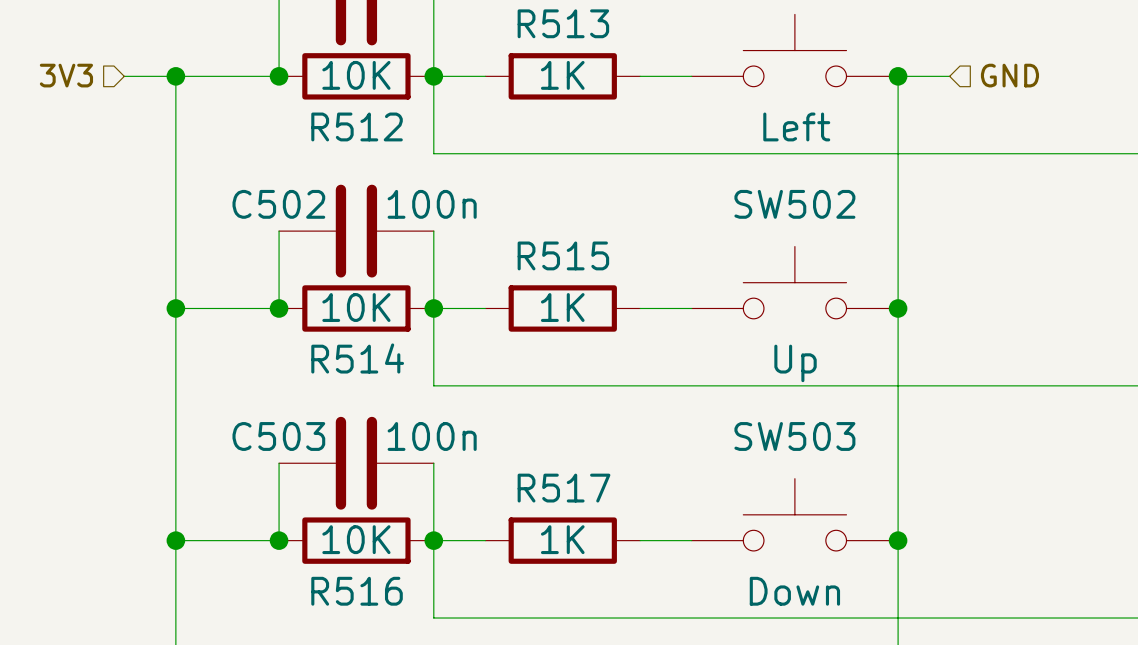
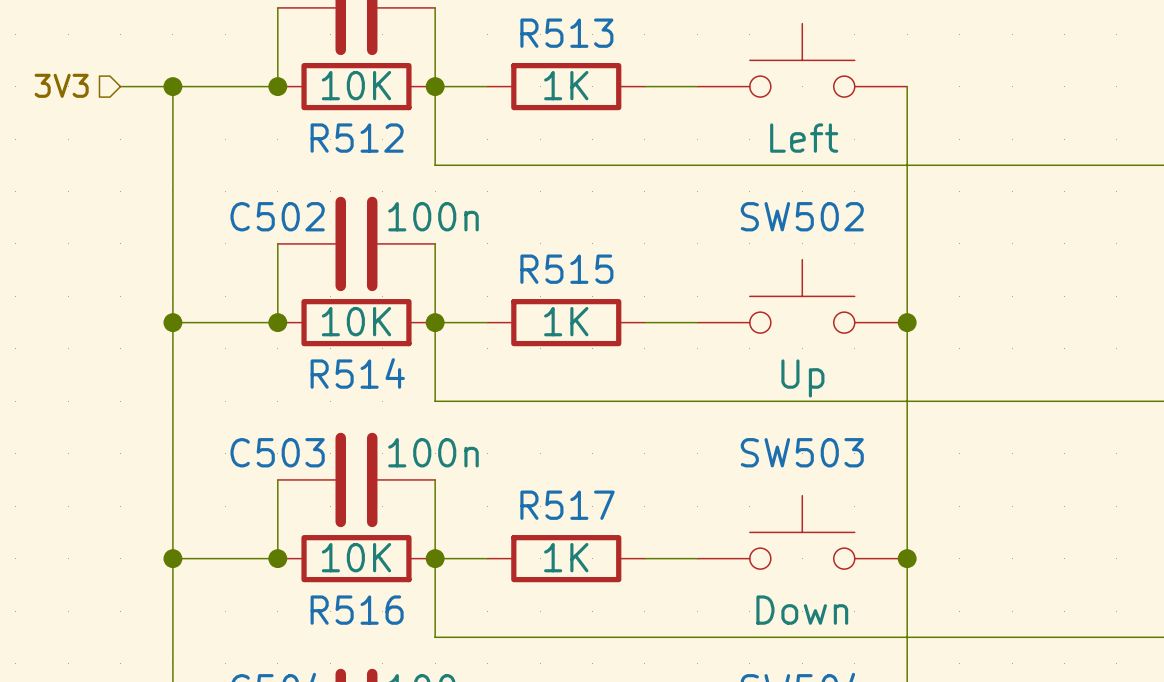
hierarchical label: GND (1009, 75) -> none
wire: (898, 76) (949, 76) -> none
junction: (898, 76) -> none

